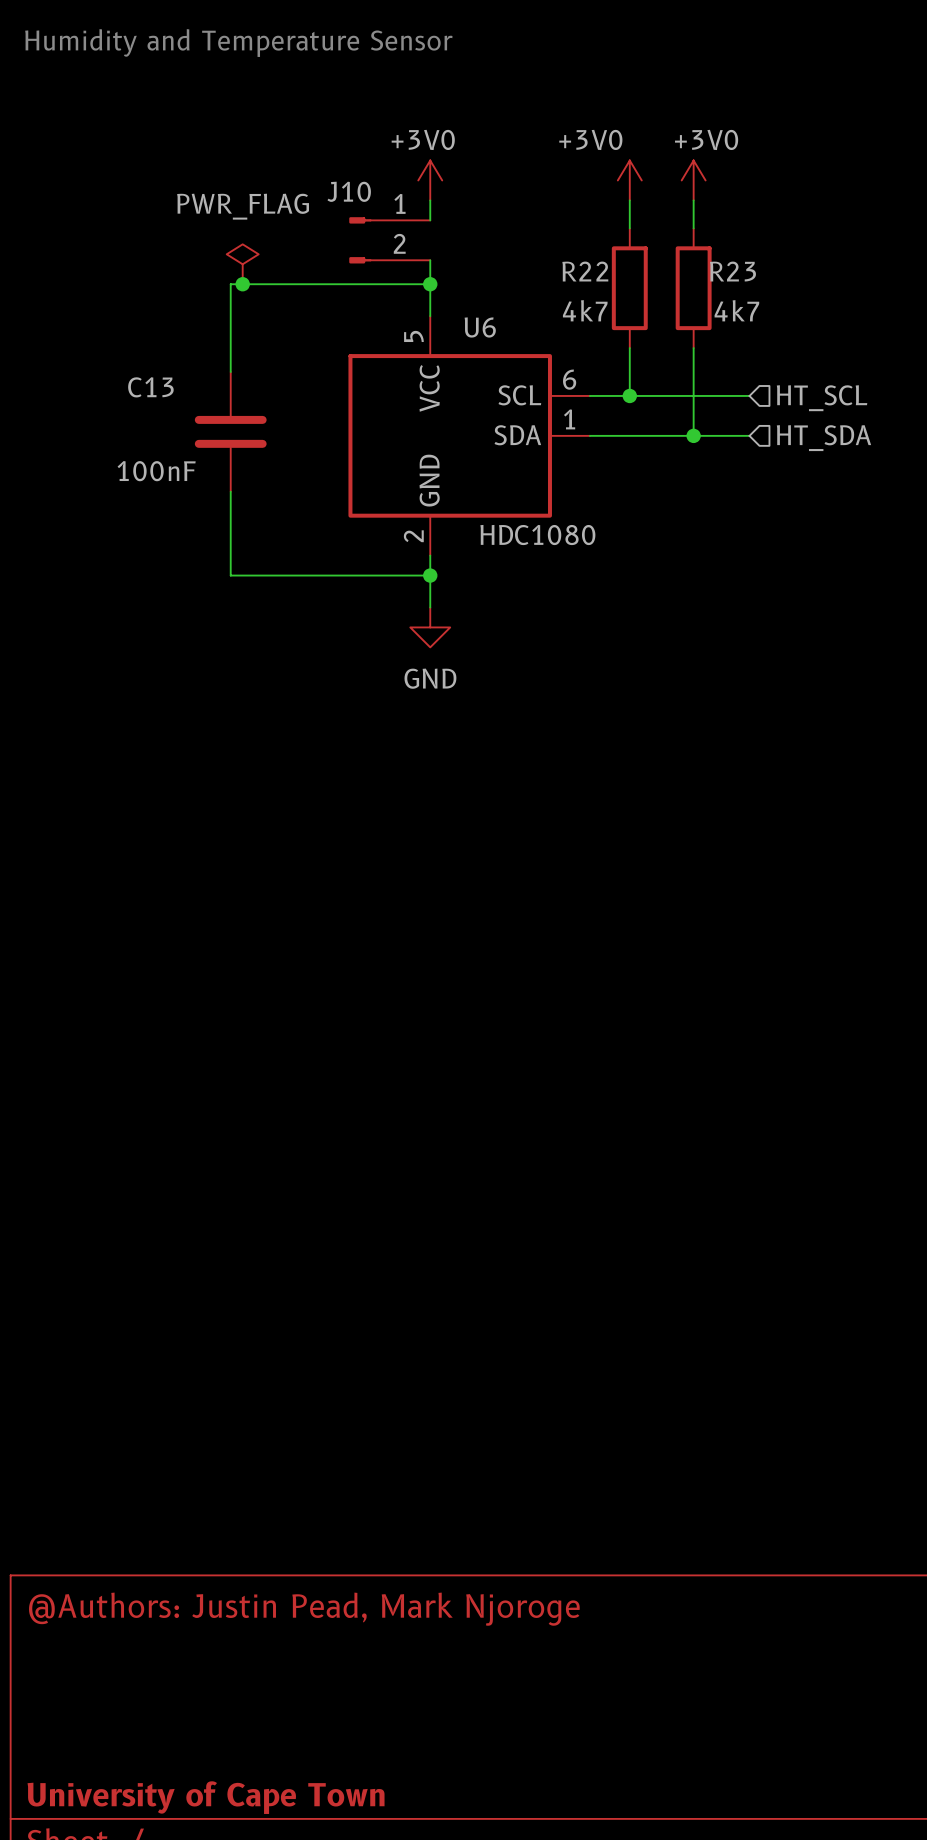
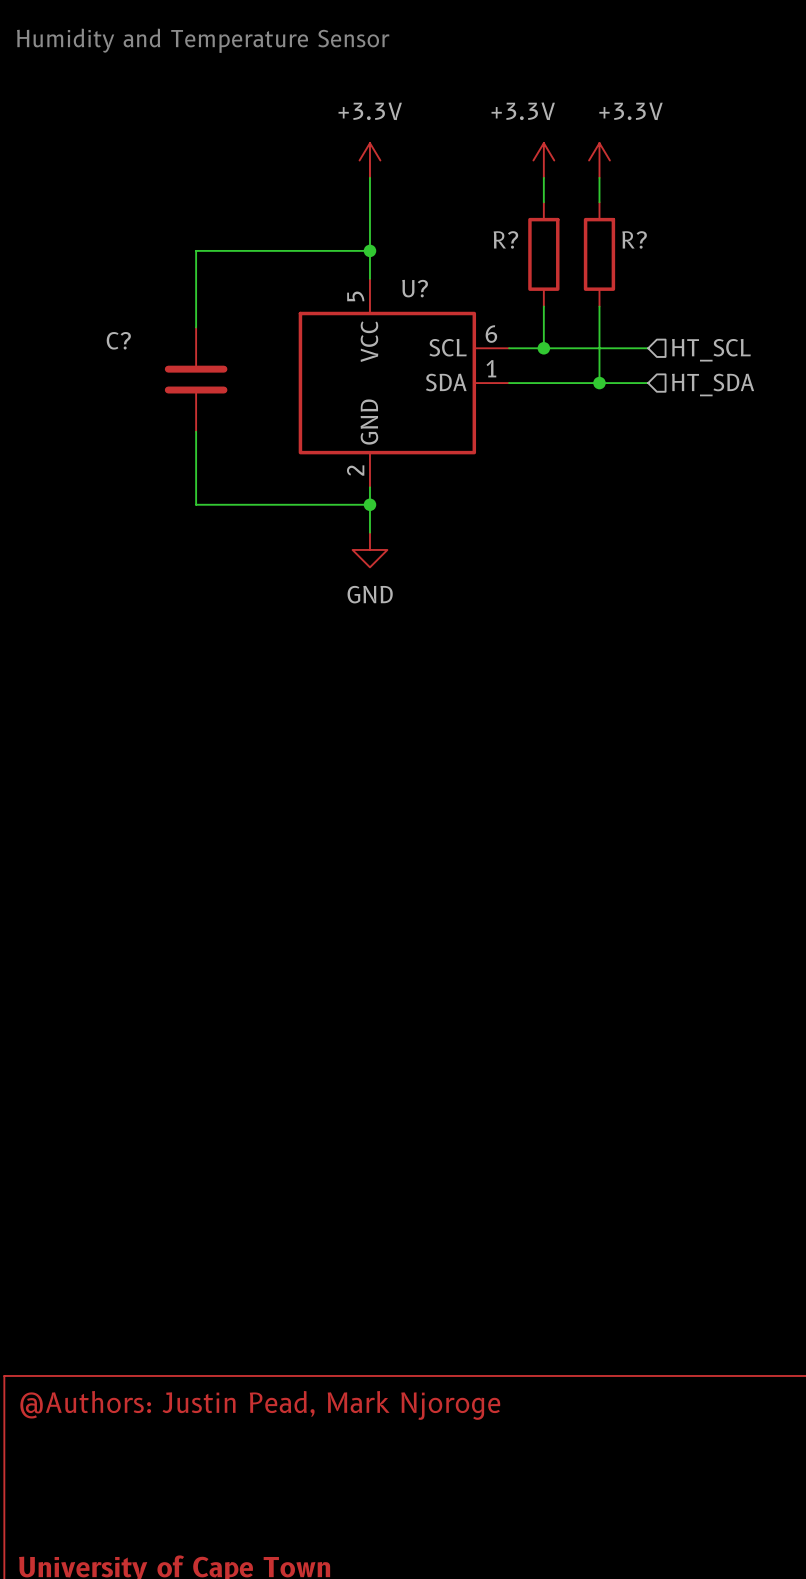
power symbol: +3V0 (430, 180) -> +3.3V (369, 160)
power symbol: +3V0 (629, 180) -> +3.3V (543, 160)
power symbol: +3V0 (693, 180) -> +3.3V (599, 160)
wire: none -> (369, 195) (369, 230)
J10: (389, 240) -> none
power symbol: PWR_FLAG (242, 264) -> none
R22 name: R22 (585, 271) -> R? (505, 239)
R23 name: R23 (732, 271) -> R? (634, 239)
junction: (242, 284) -> none
R22 value: 4k7 (585, 310) -> none
R23 value: 4k7 (736, 310) -> none
U6 name: U6 (480, 327) -> U? (415, 288)
C13 name: C13 (150, 387) -> C? (118, 340)
C13 value: 100nF (156, 471) -> none
U6 value: HDC1080 (537, 535) -> none

